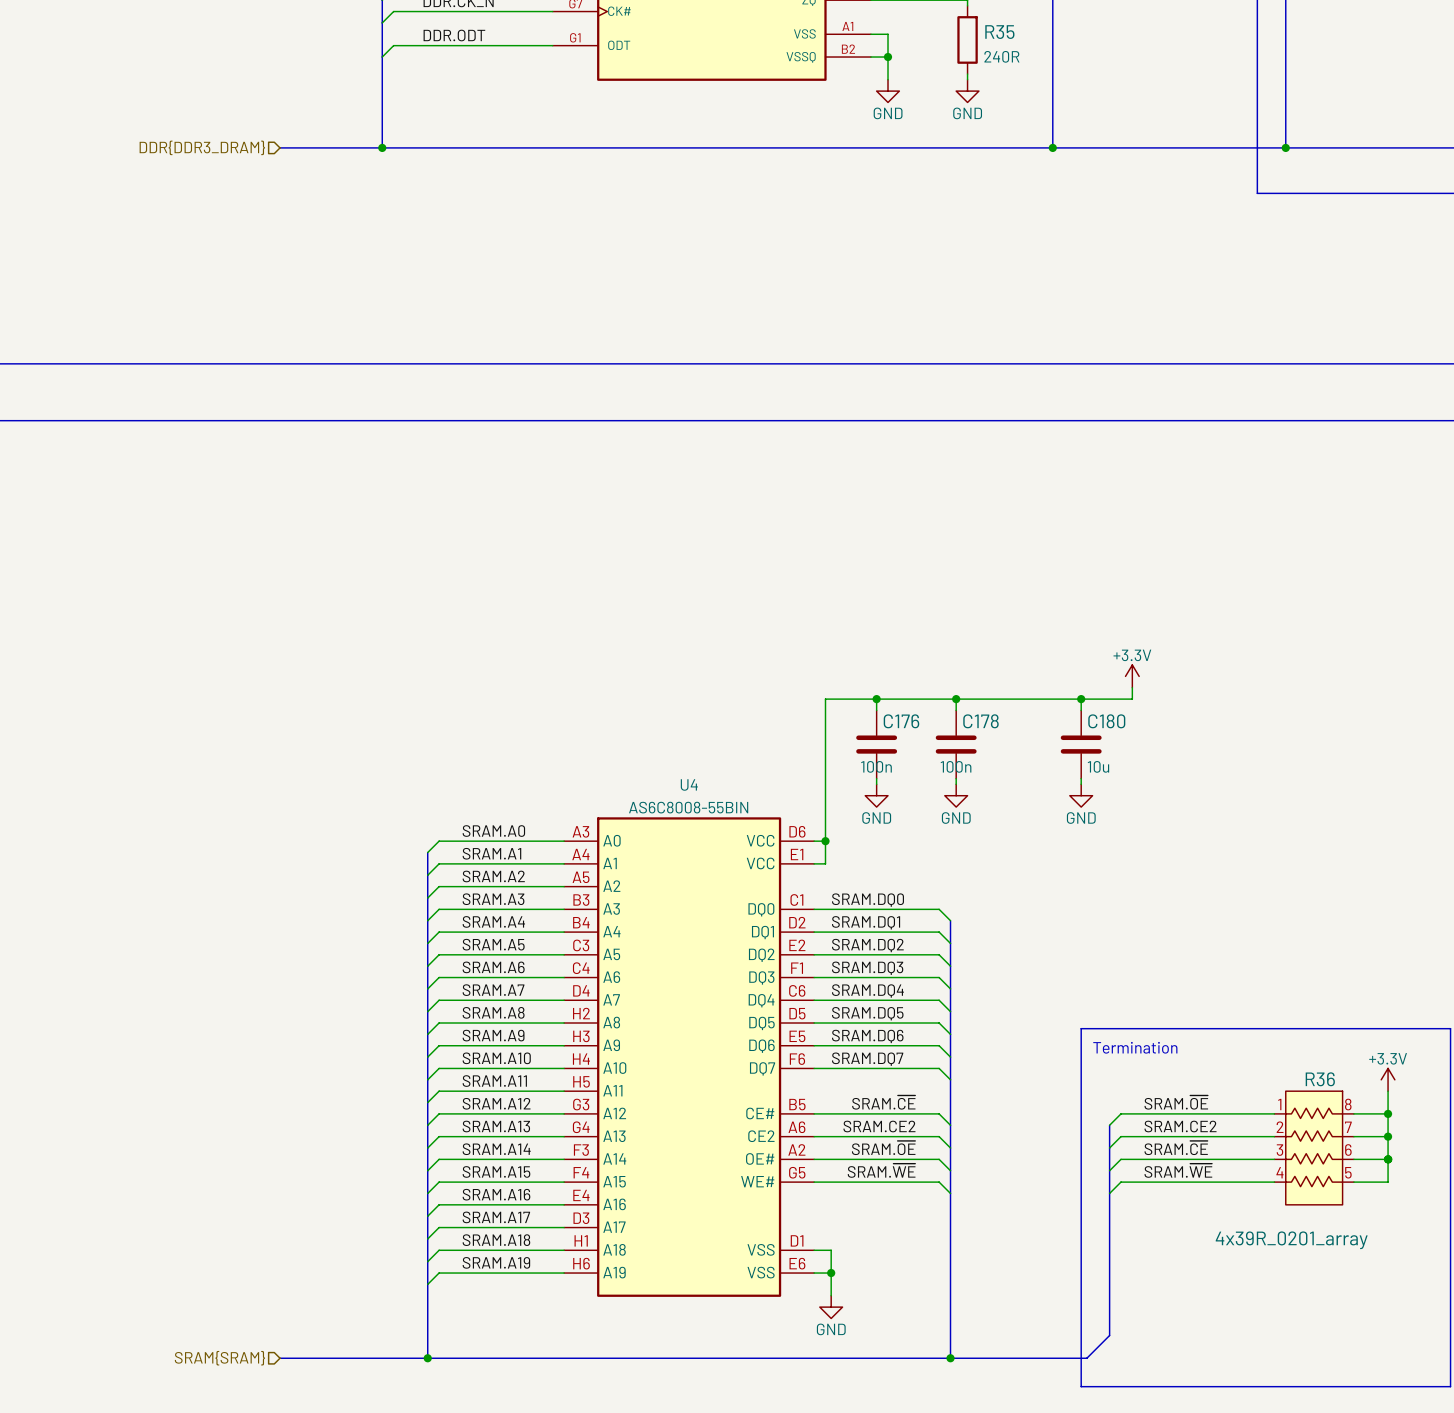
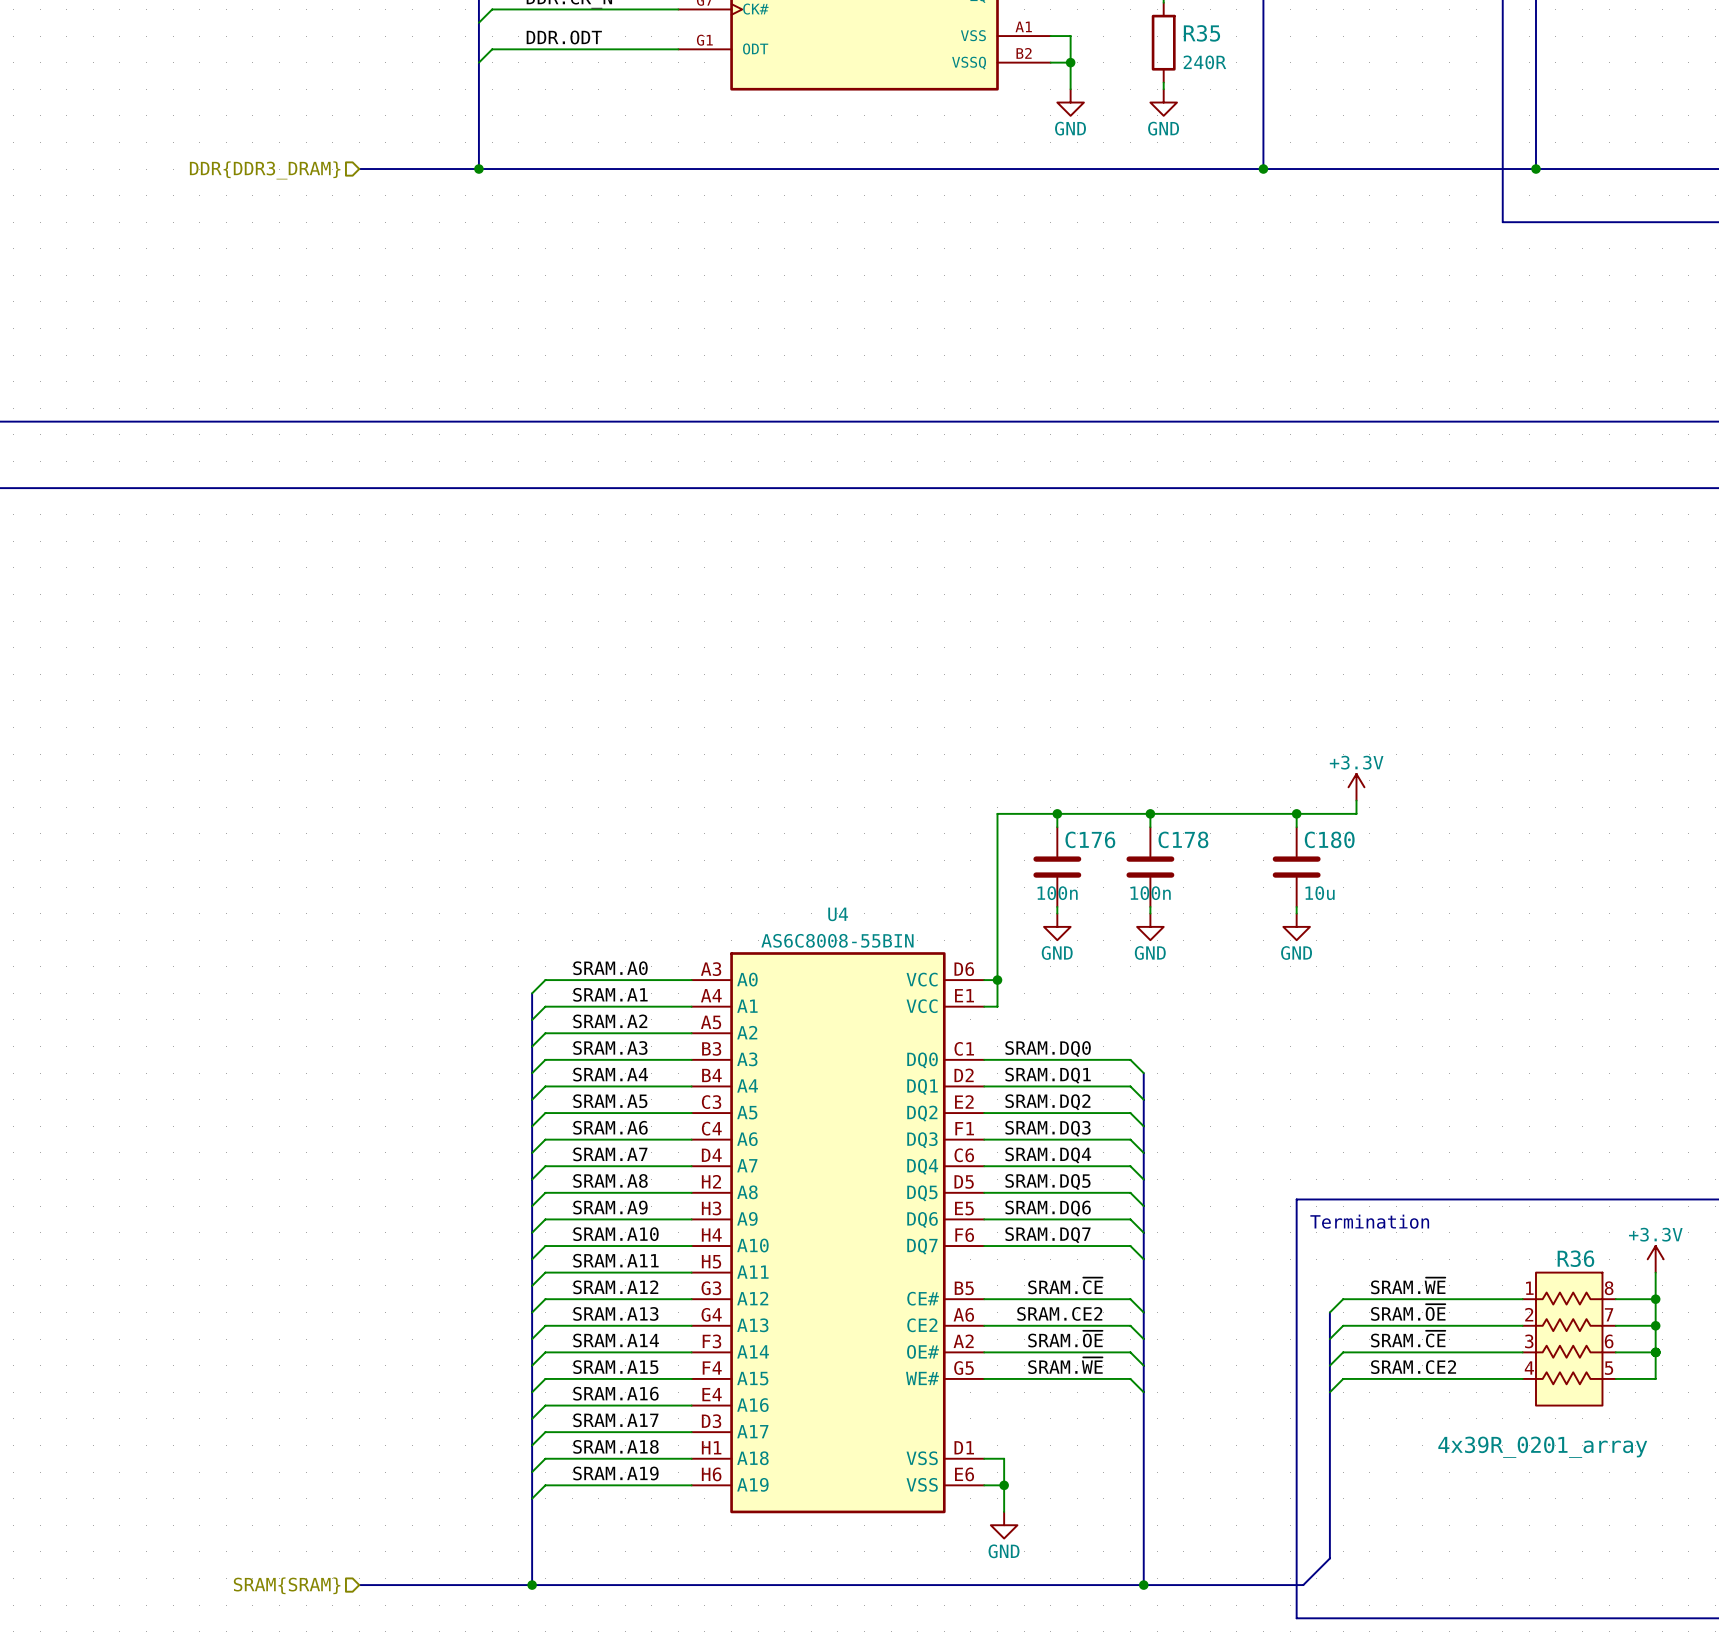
label: SRAM.~{OE} (1176, 1102) -> SRAM.~{WE} (1408, 1285)
label: SRAM.CE2 (1180, 1126) -> SRAM.~{OE} (1408, 1312)
label: SRAM.~{WE} (1178, 1170) -> SRAM.CE2 (1413, 1367)

